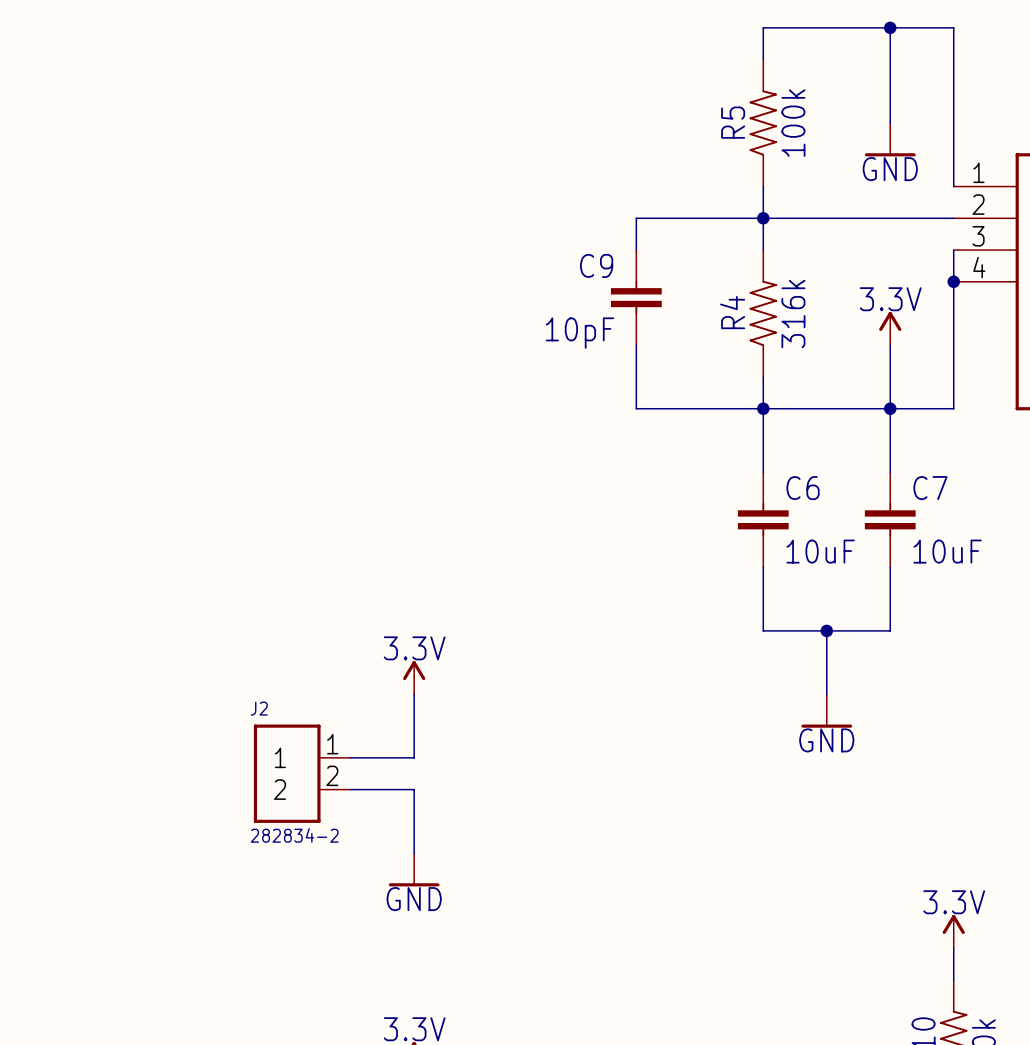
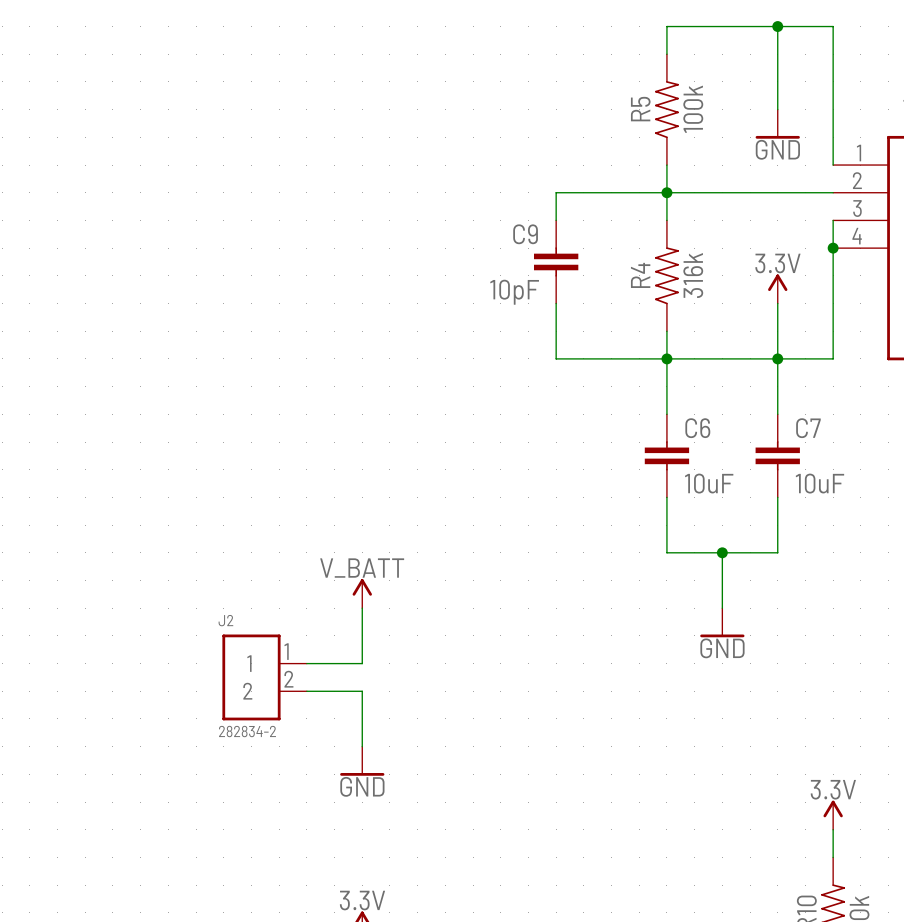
power symbol: 3.3V (414, 677) -> V_BATT (362, 593)

